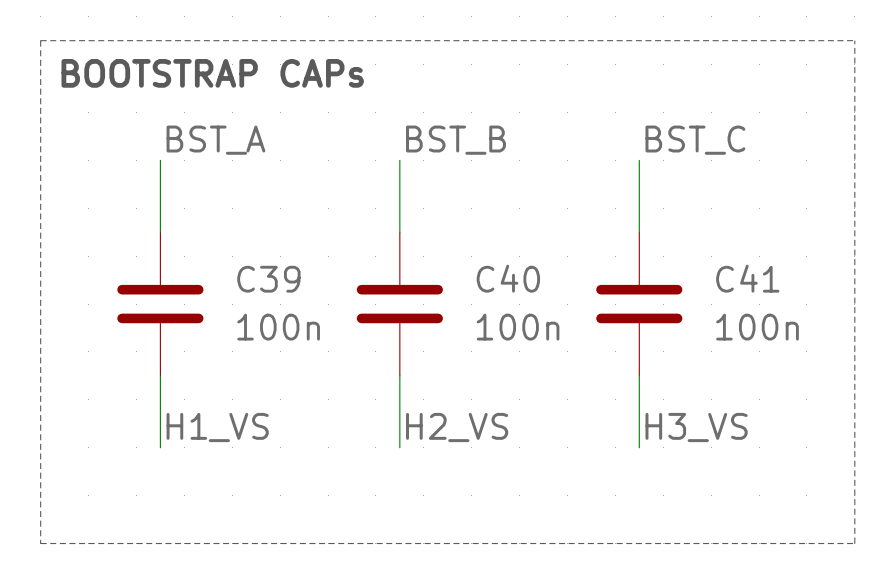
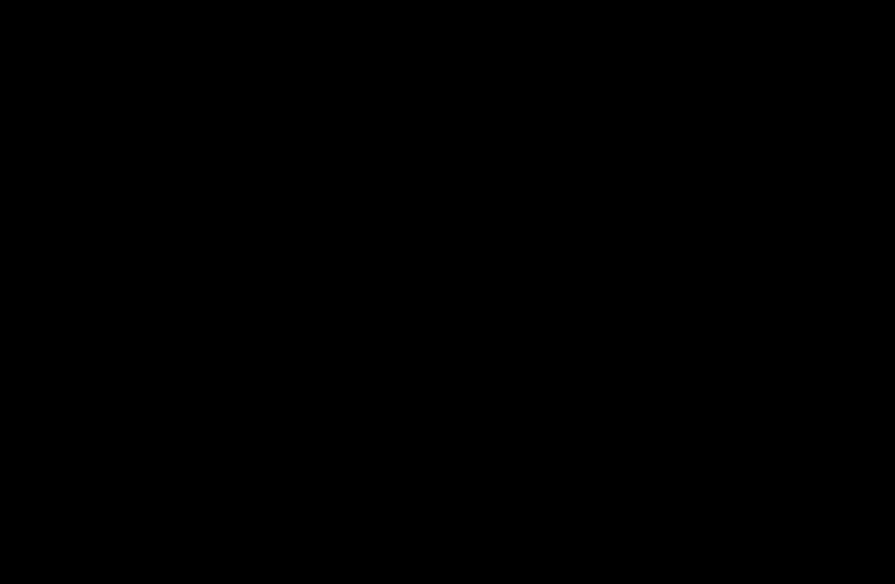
line: (40, 40) (40, 543) (854, 543) (854, 40) (40, 40) -> none
text: BOOTSTRAP CAPs (212, 73) -> none
label: BST_A (215, 140) -> none
label: BST_B (455, 140) -> none
label: BST_C (695, 140) -> none
wire: (160, 160) (160, 232) -> none
wire: (399, 160) (399, 232) -> none
wire: (639, 160) (639, 232) -> none
C39: 100n (160, 304) -> none
C40: 100n (399, 304) -> none
C41: 100n (639, 304) -> none
wire: (160, 375) (160, 447) -> none
wire: (399, 375) (399, 447) -> none
wire: (639, 375) (639, 447) -> none
label: H1_VS (217, 427) -> none
label: H2_VS (457, 427) -> none
label: H3_VS (696, 427) -> none

